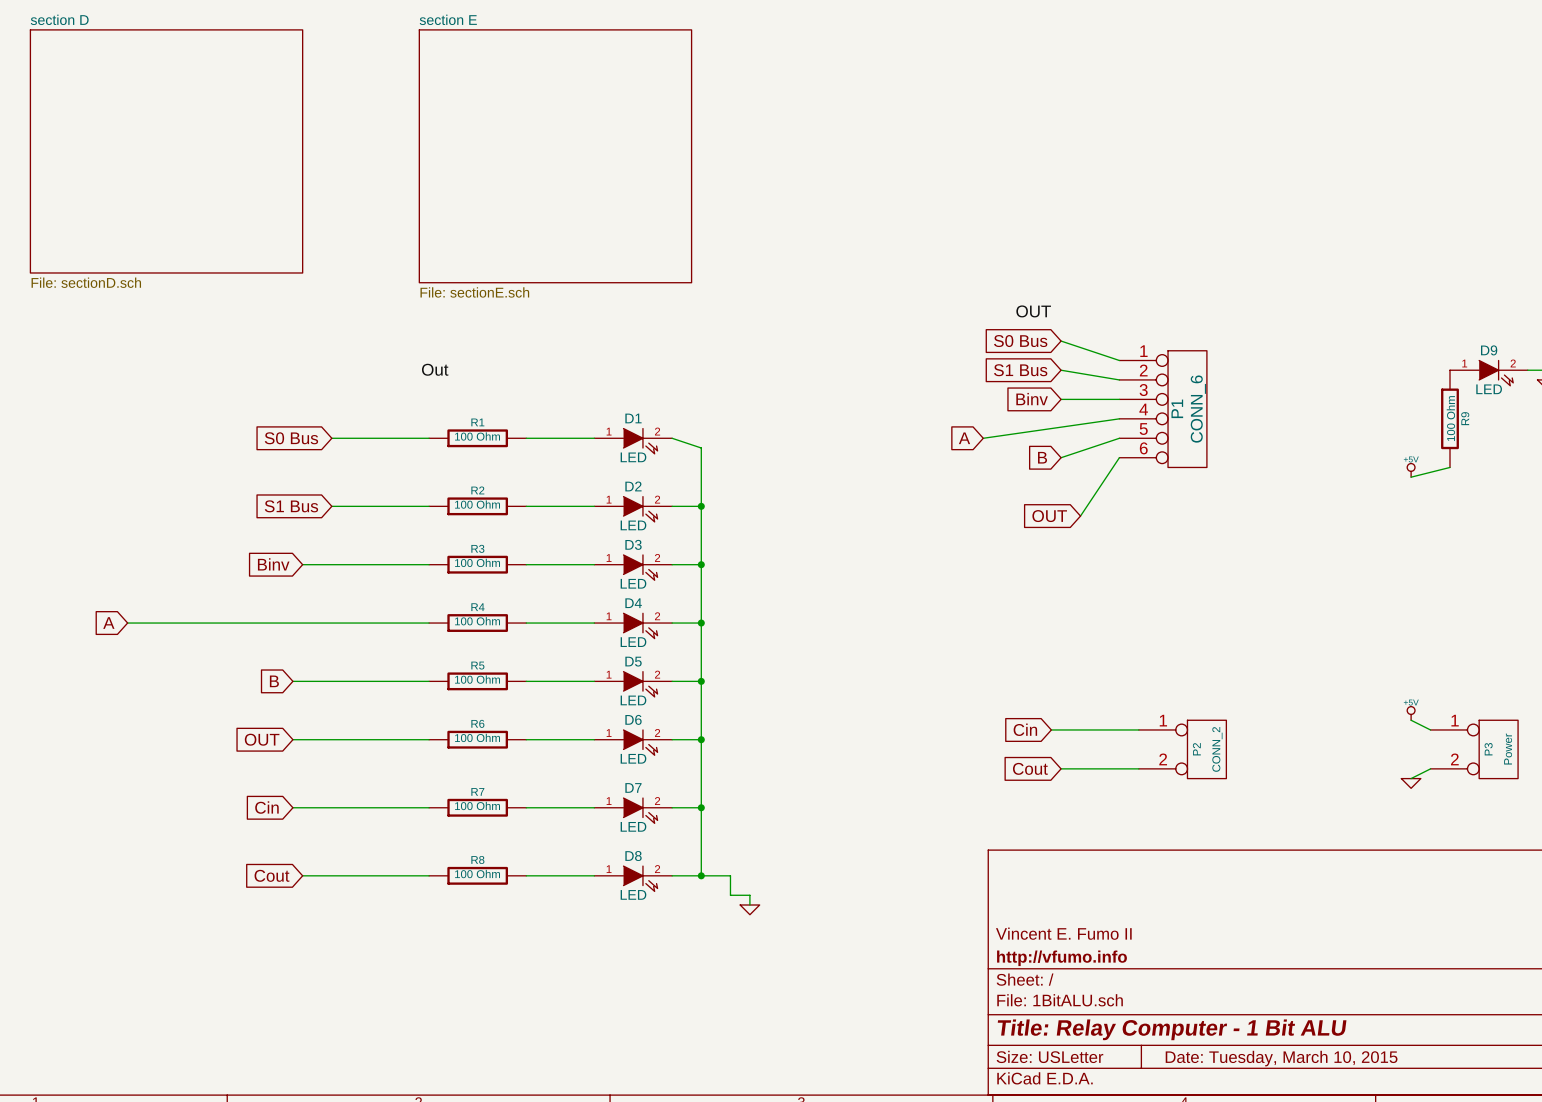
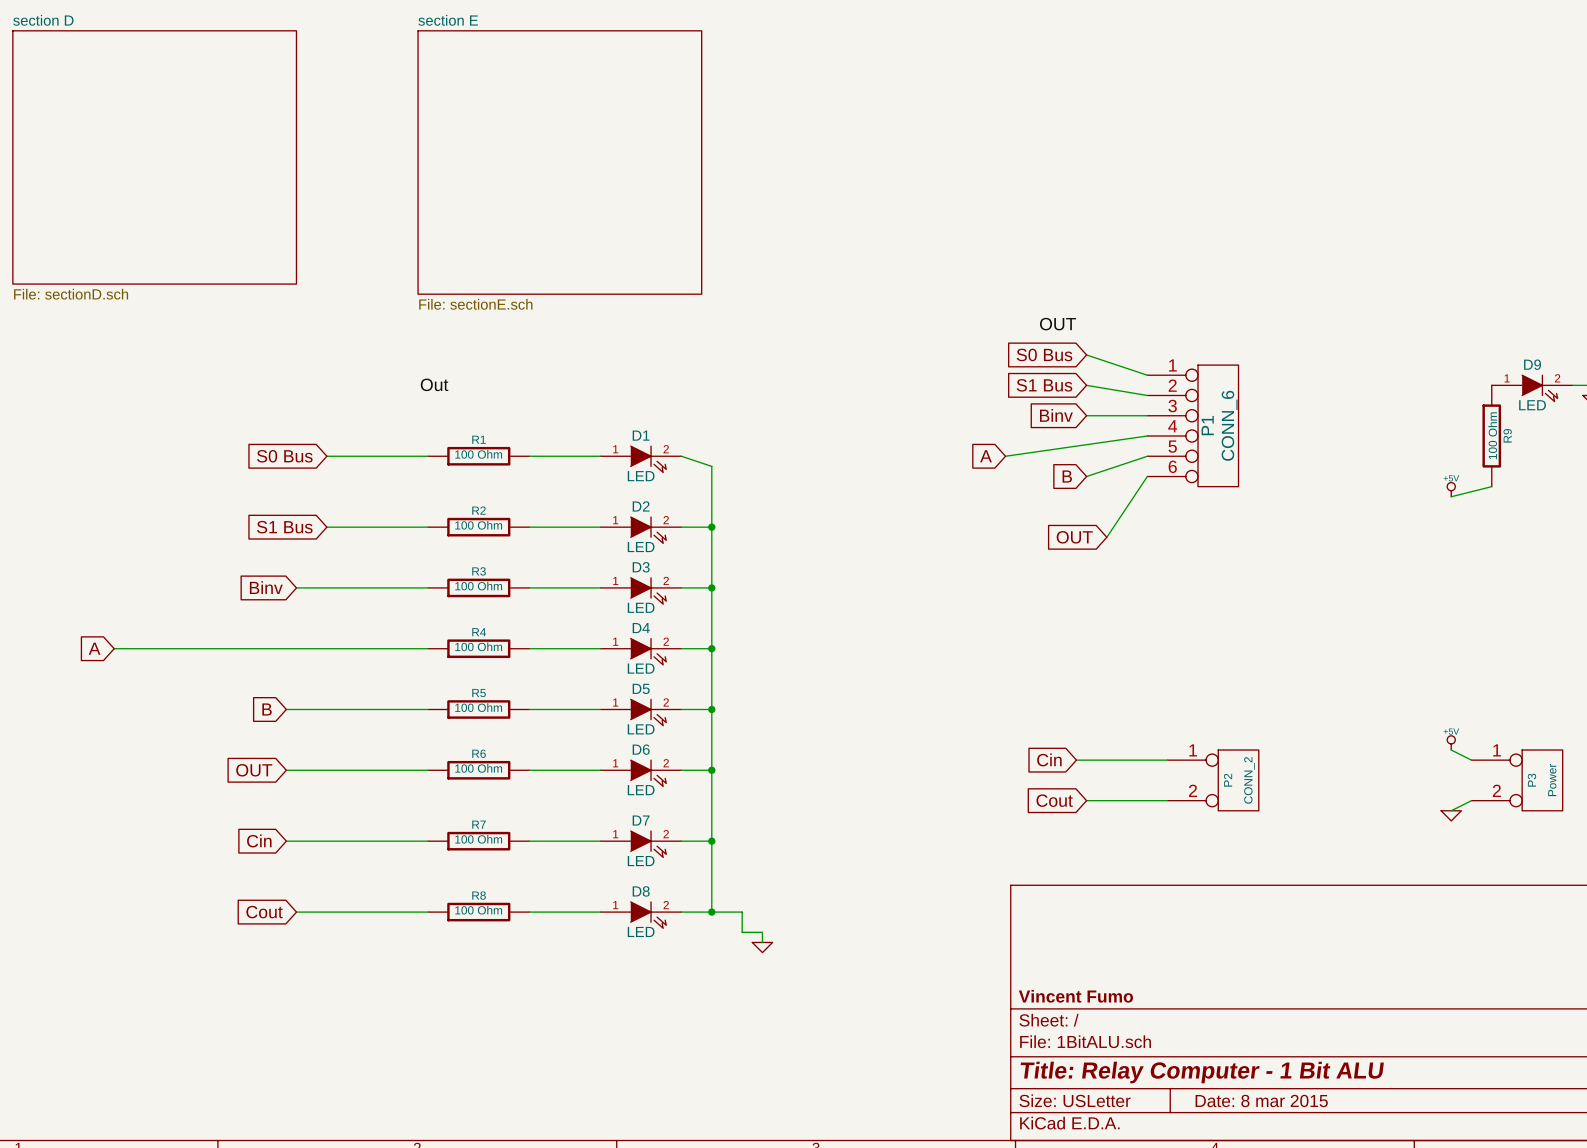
title block: Vincent E. Fumo II (1063, 933) -> none
title block: http://vfumo.info (1061, 958) -> Vincent Fumo (1075, 996)
title block: Date: Tuesday, March 10, 2015 (1281, 1058) -> Date: 8 mar 2015 (1261, 1100)

